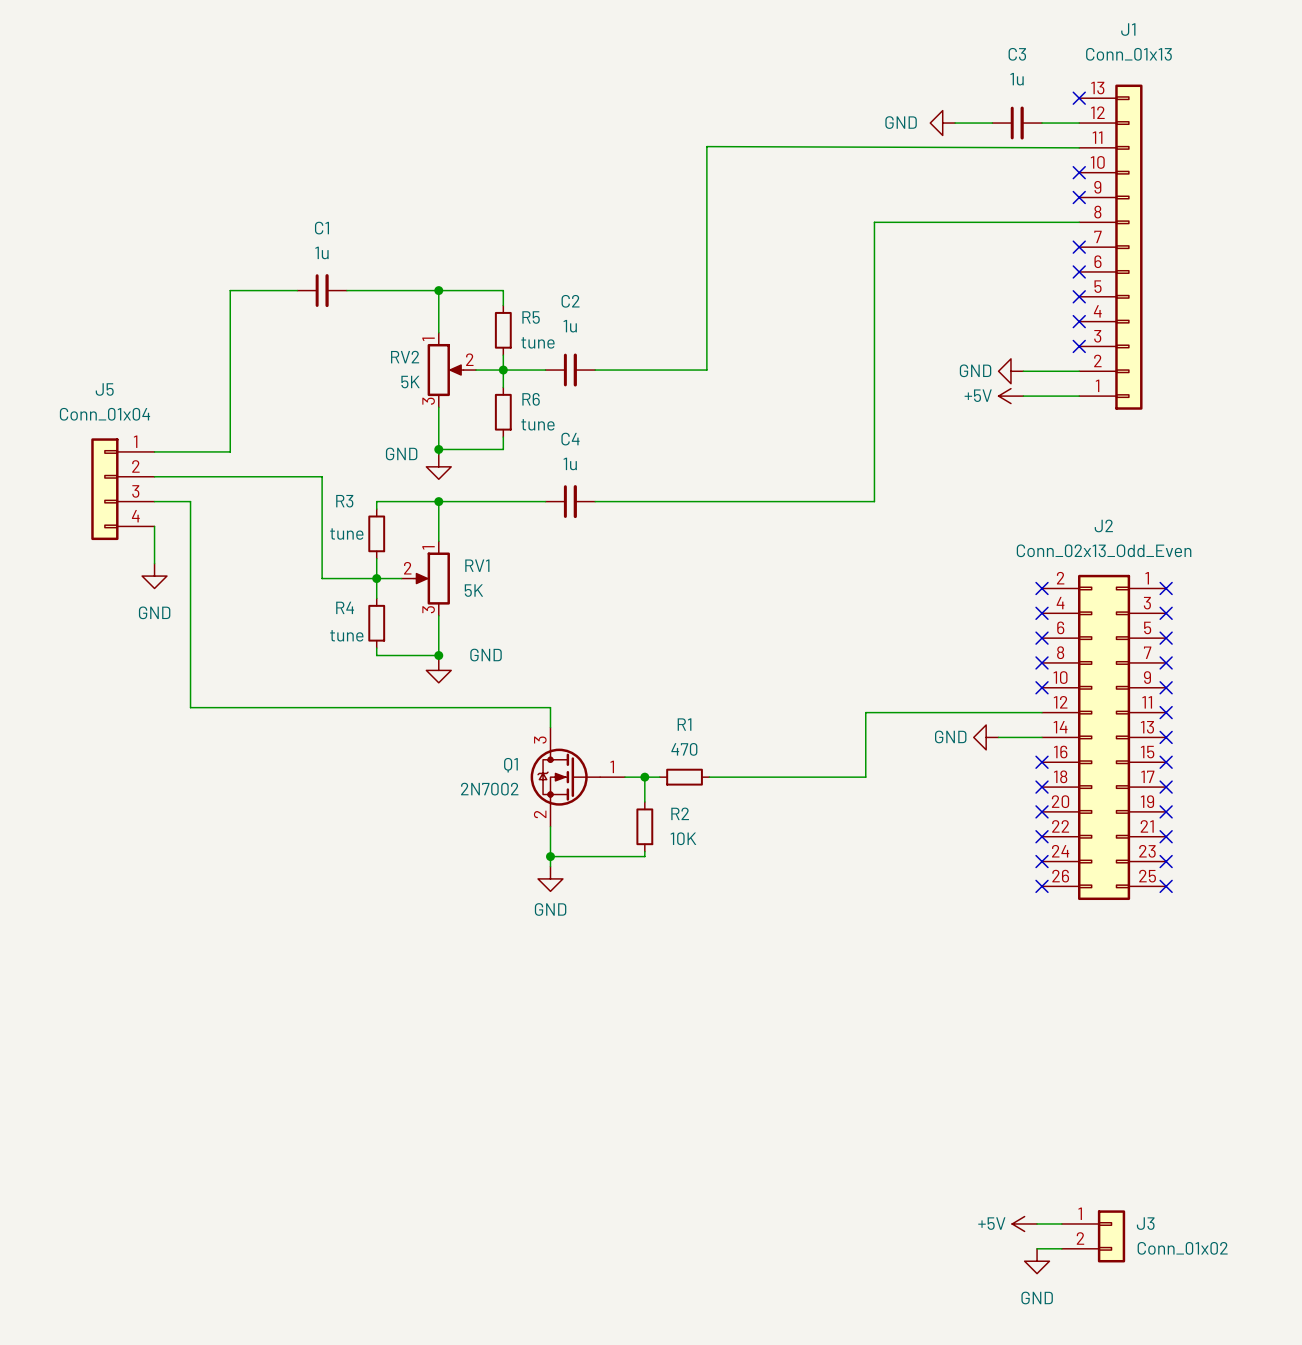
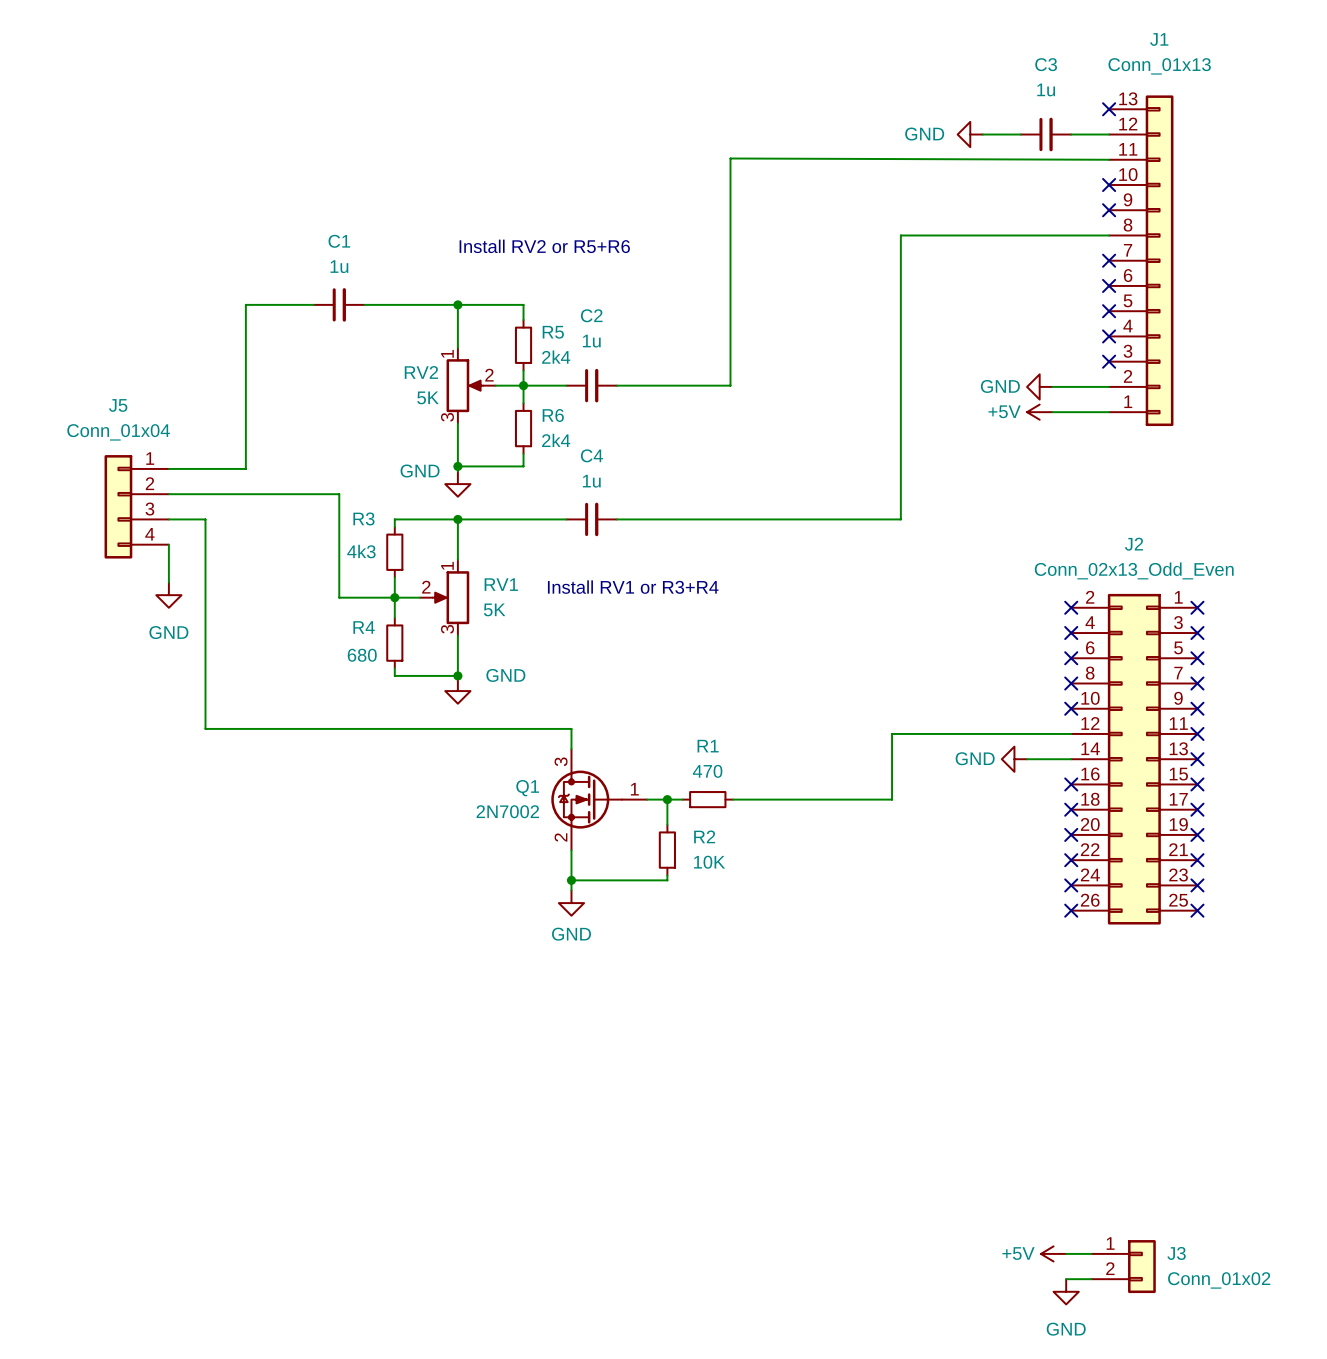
text: none -> Install RV2 or R5+R6 (544, 246)
R5 value: tune (537, 342) -> 2k4 (556, 357)
R6 value: tune (537, 424) -> 2k4 (556, 440)
R3 value: tune (346, 534) -> 4k3 (361, 551)
text: none -> Install RV1 or R3+R4 (633, 587)
R4 value: tune (346, 635) -> 680 (362, 655)

